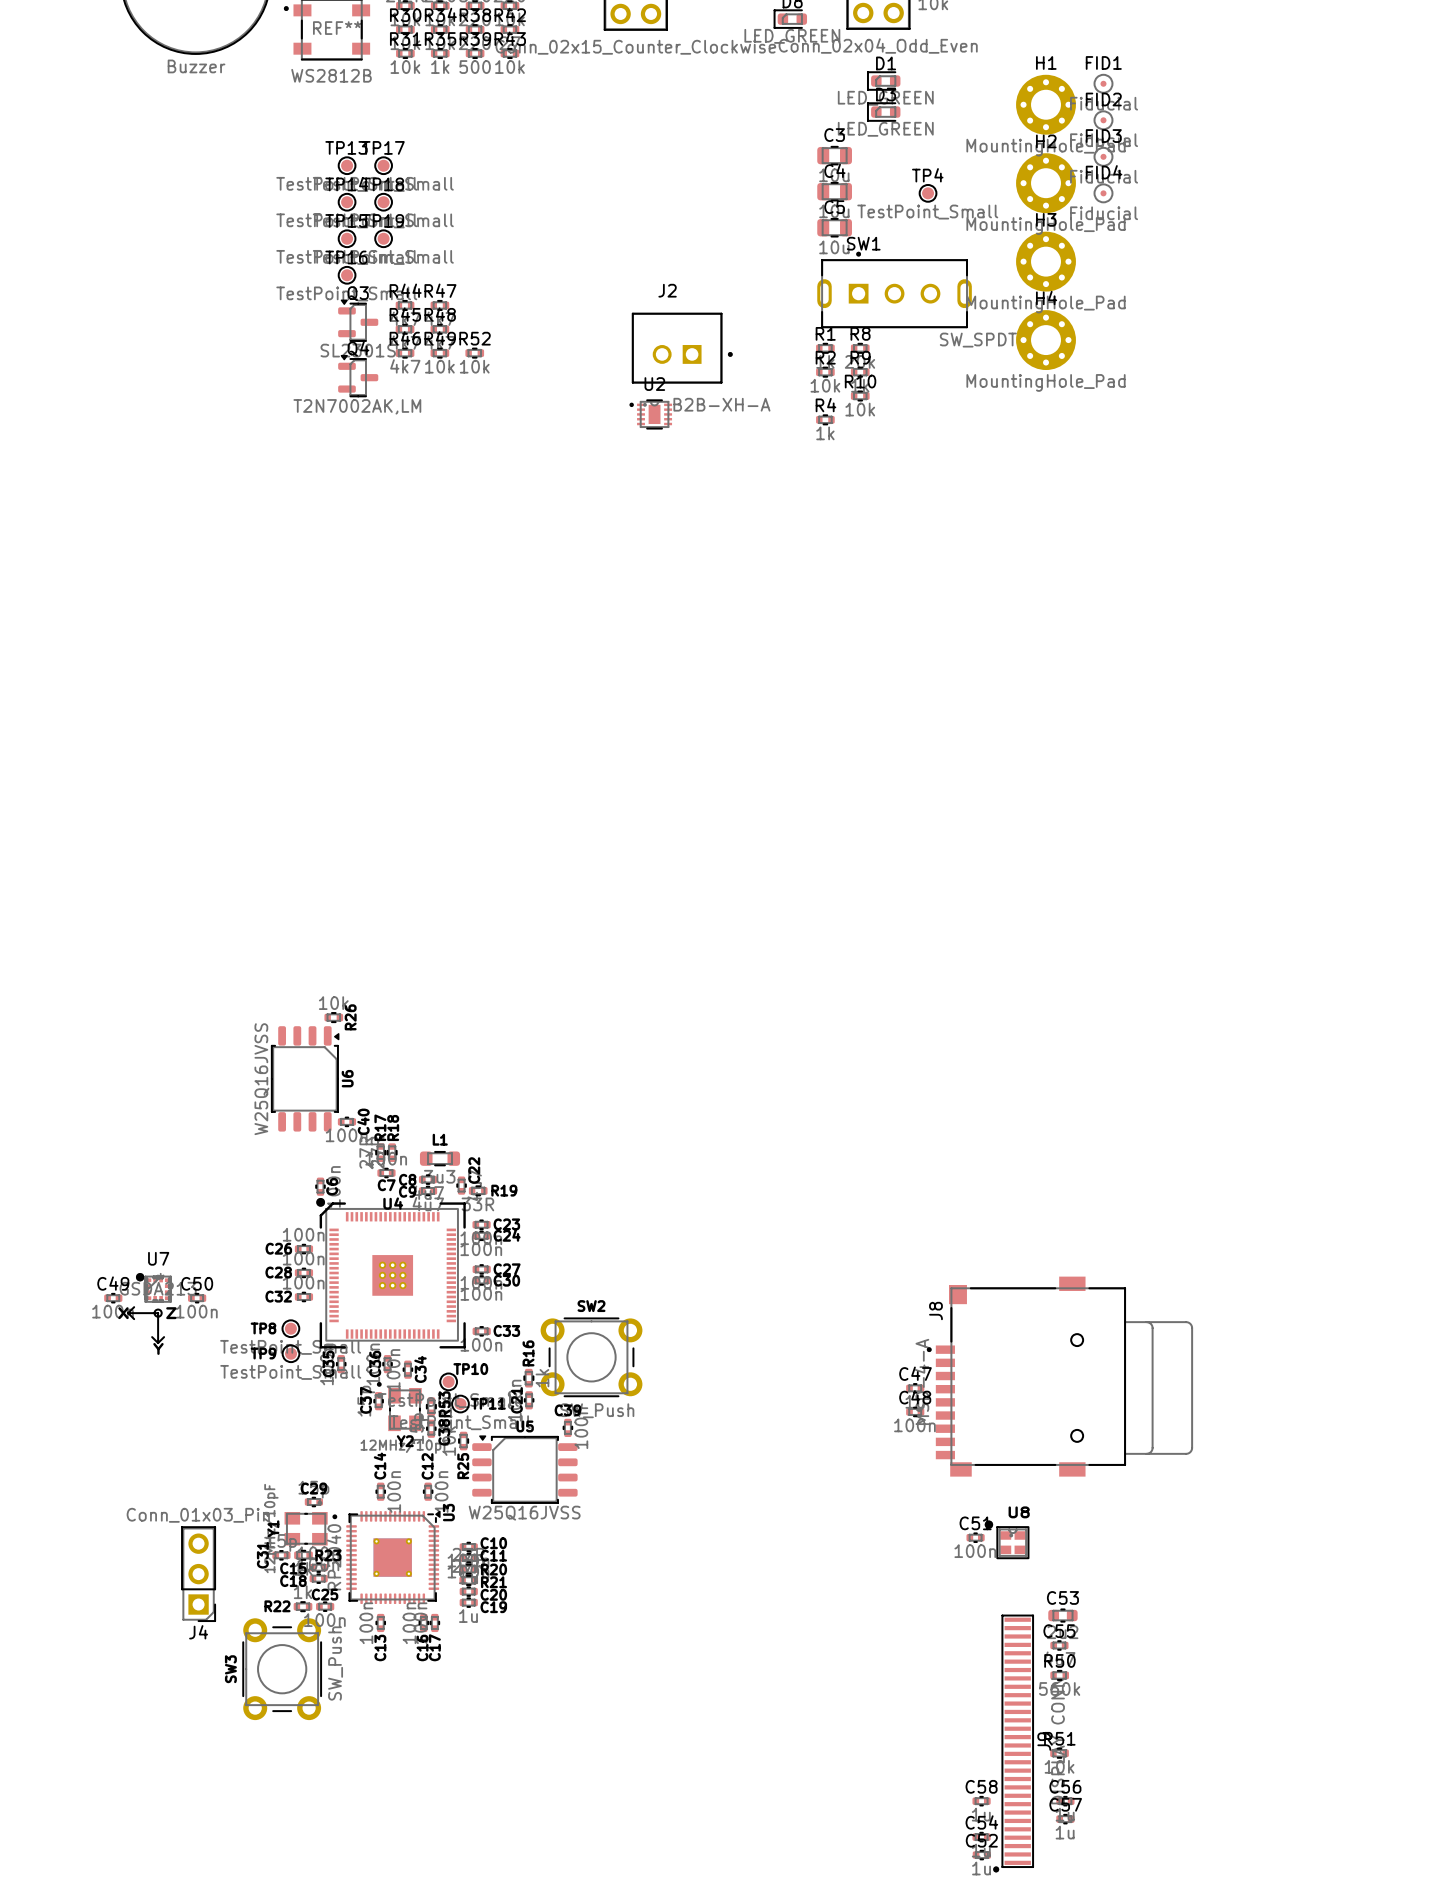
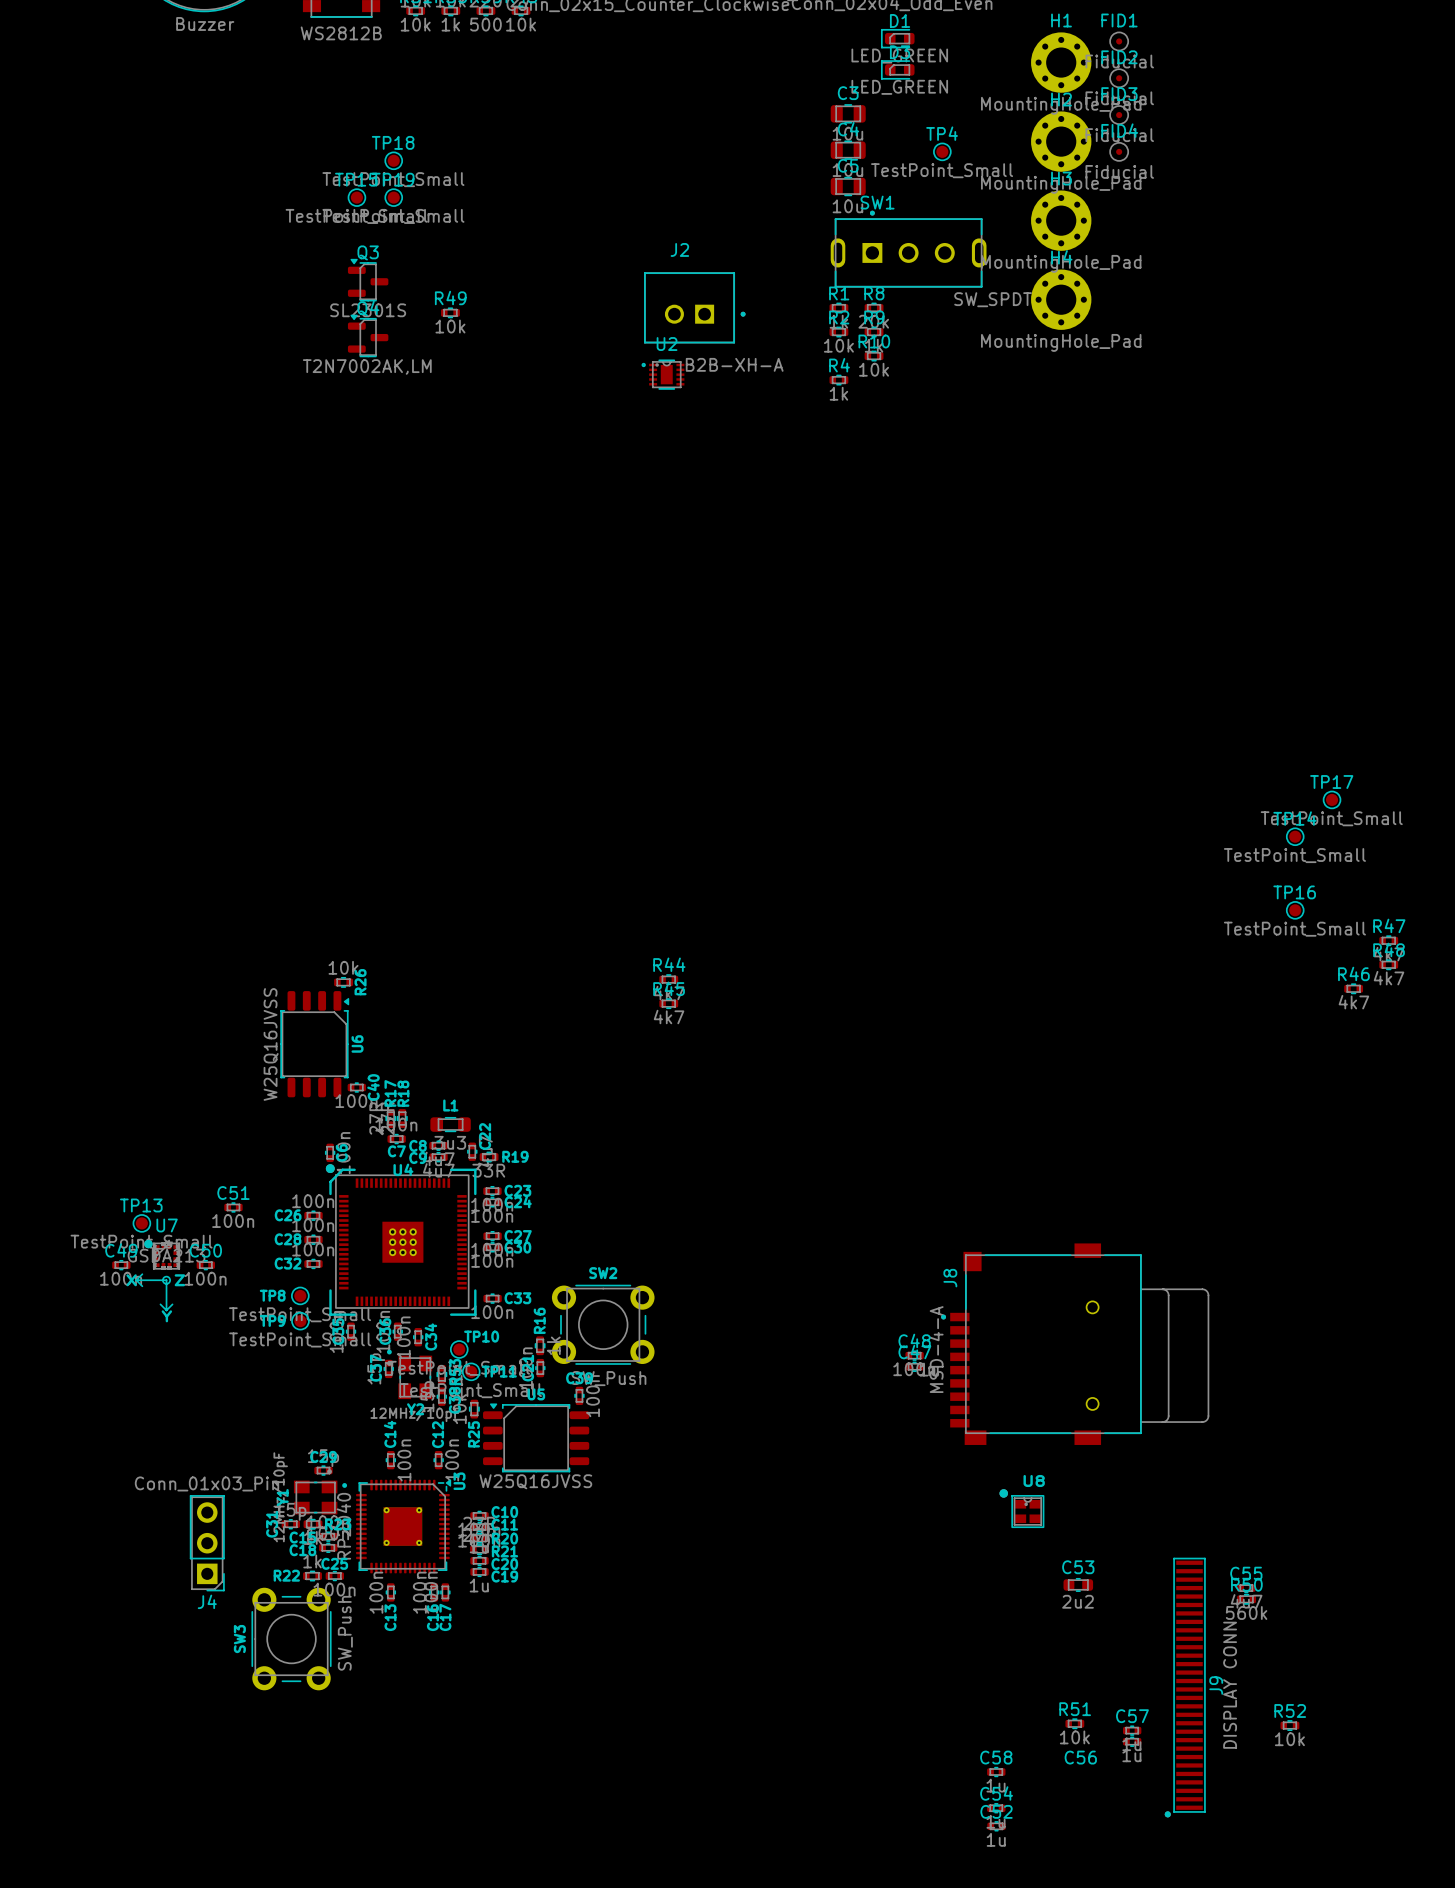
TP13 position: (347, 165) -> (141, 1223)
TP17 position: (383, 165) -> (1332, 799)
TP14 position: (347, 202) -> (1295, 836)
TP16 position: (347, 275) -> (1295, 910)
R44 position: (405, 305) -> (668, 979)
R47 position: (439, 305) -> (1388, 940)
R45 position: (405, 329) -> (668, 1003)
R48 position: (439, 329) -> (1388, 964)
R46 position: (405, 353) -> (1353, 988)
R52 position: (474, 353) -> (1289, 1725)
C47 position: (915, 1388) -> (914, 1366)
C48 position: (915, 1411) -> (914, 1355)
C51 position: (975, 1537) -> (233, 1207)
C55 position: (1059, 1645) -> (1246, 1588)
R50 position: (1059, 1675) -> (1246, 1599)
J9 position: (1013, 1743) -> (1185, 1687)
C56 position: (1065, 1801) -> (1132, 1741)
C57 position: (1065, 1819) -> (1132, 1730)

